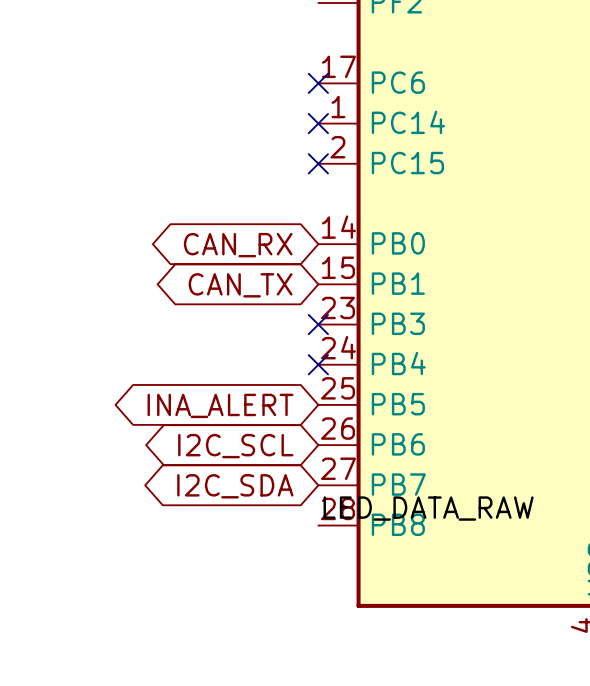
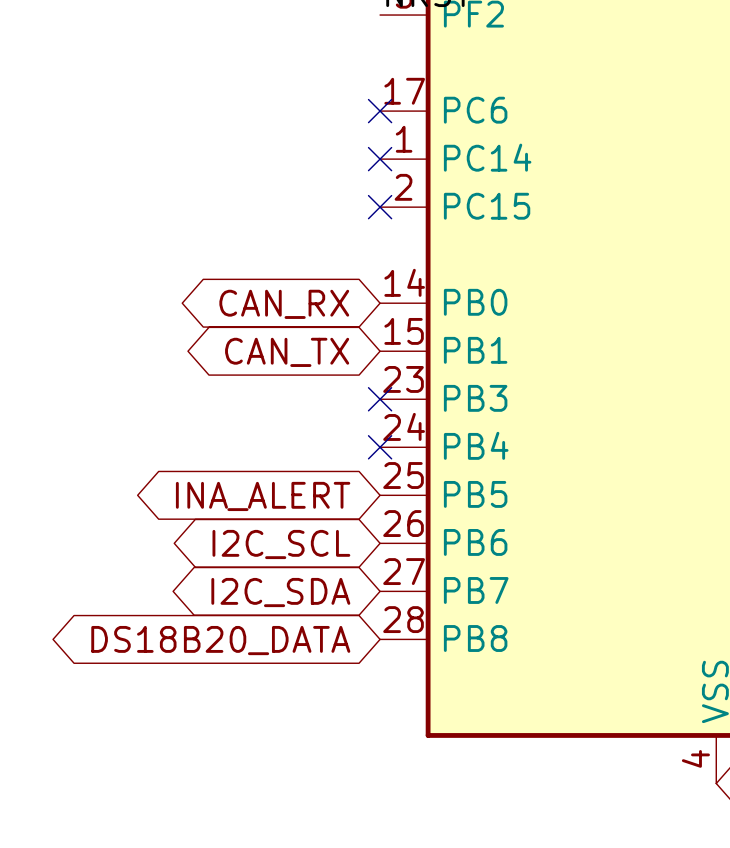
label: LED_DATA_RAW (428, 508) -> none
global label: none -> DS18B20_DATA (220, 640)

